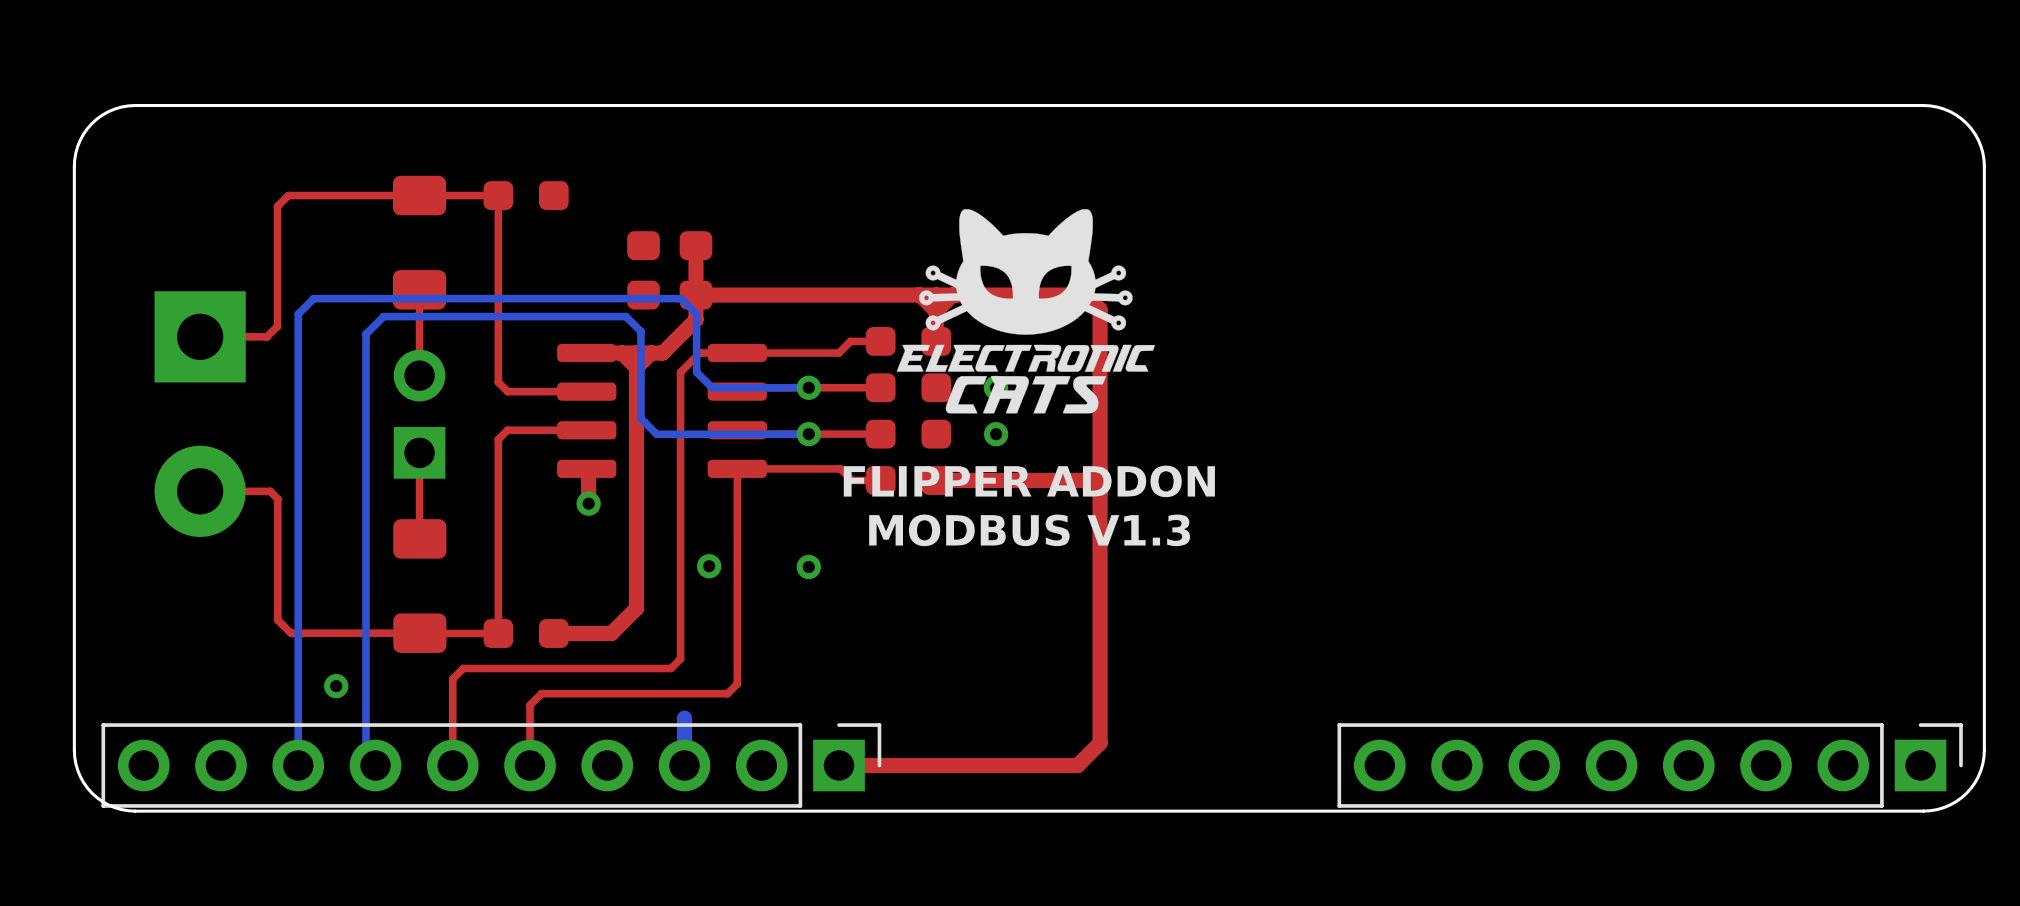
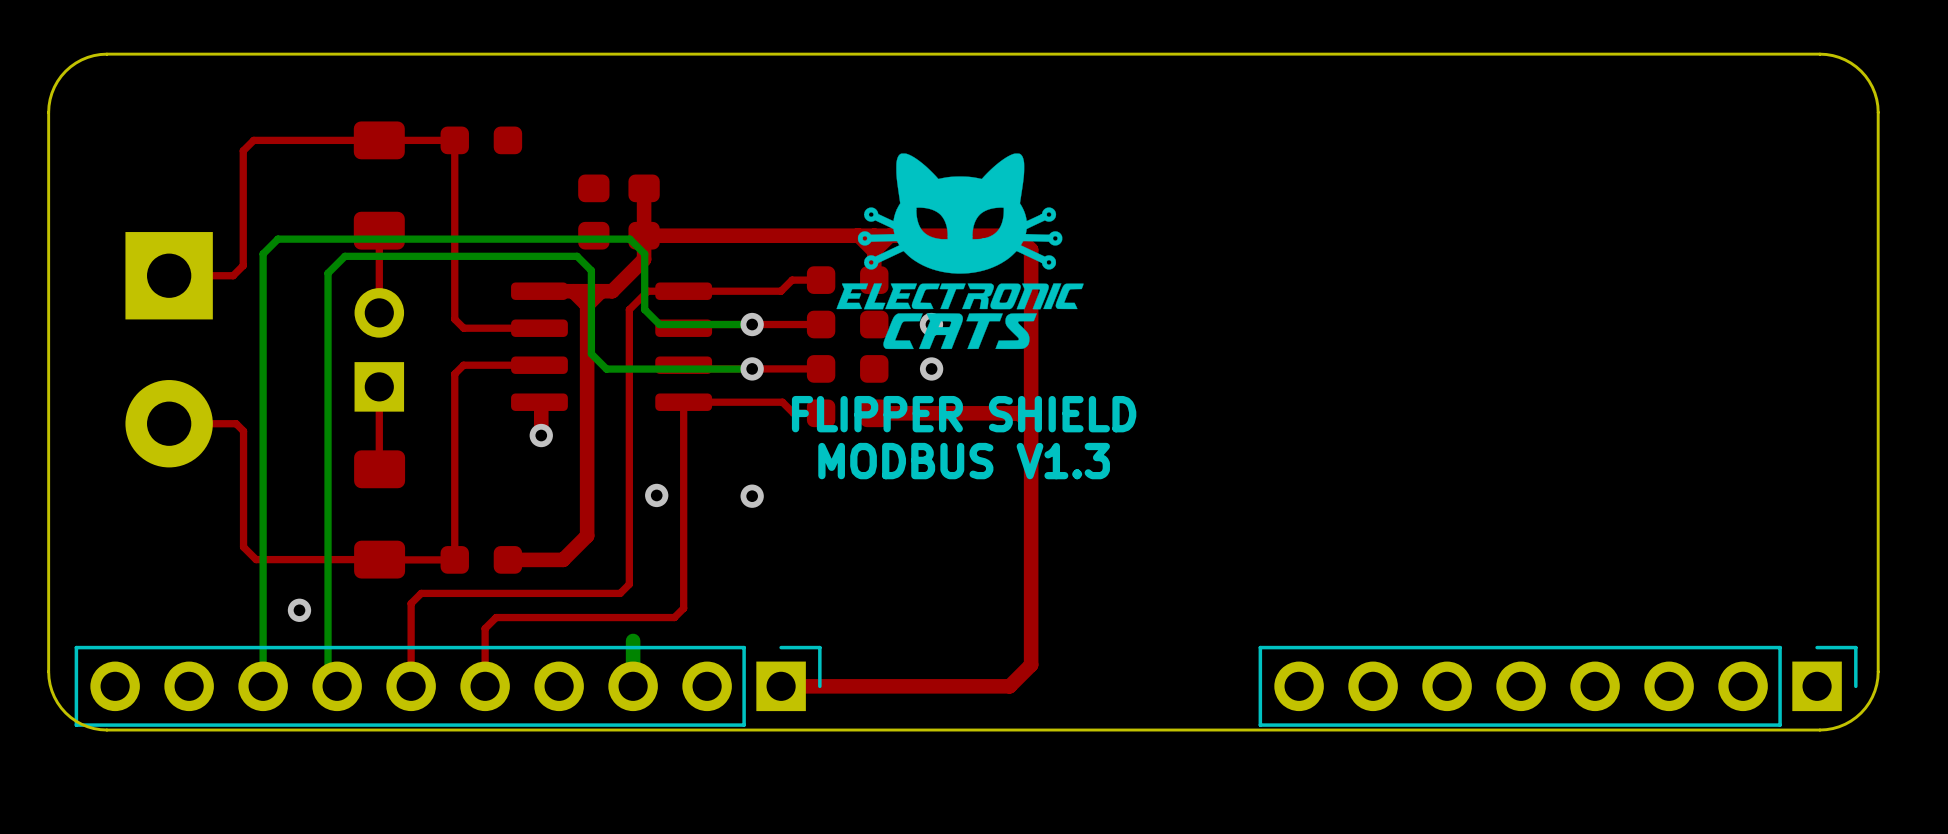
text: FLIPPER ADDON (1029, 481) -> FLIPPER SHIELD (964, 414)

